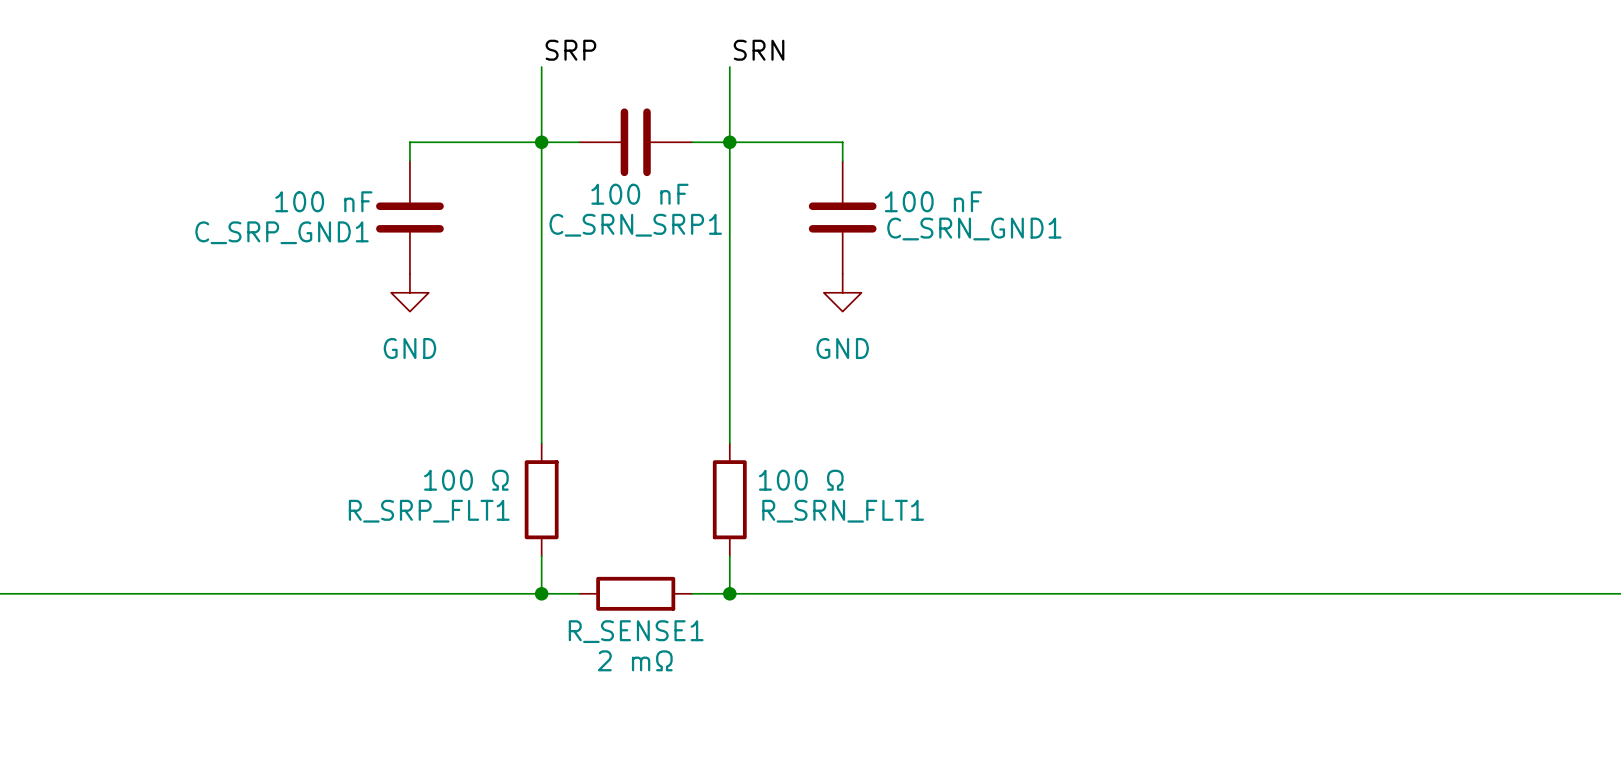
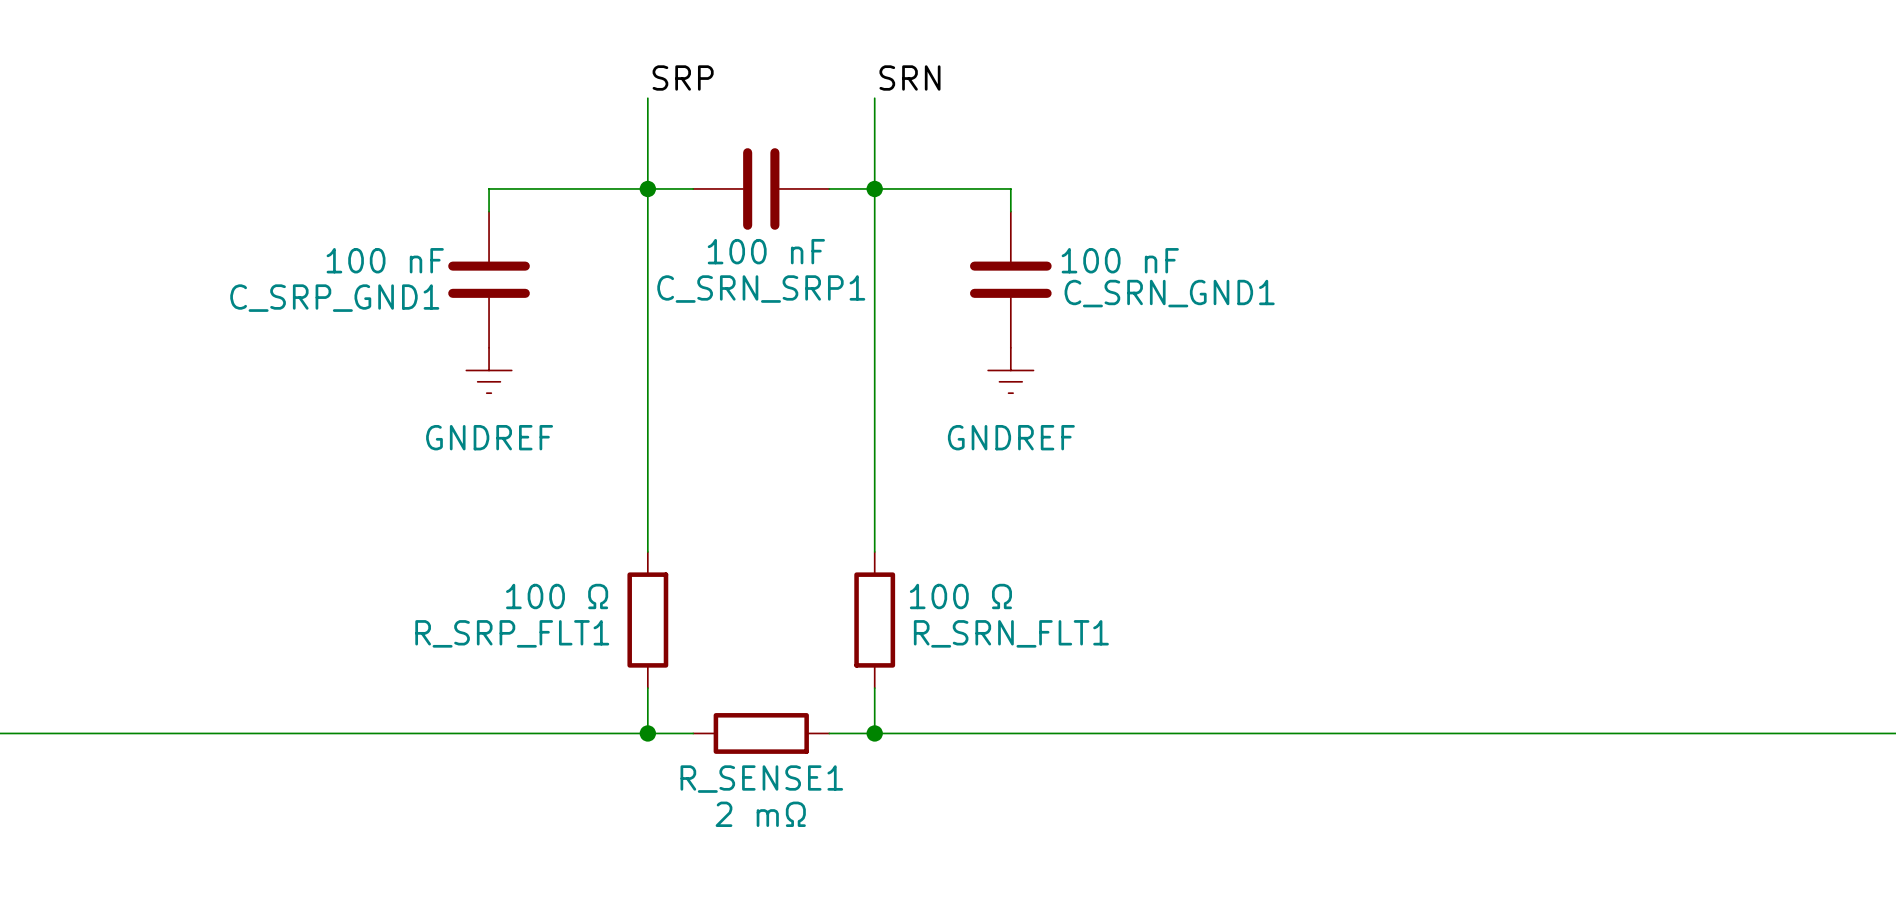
power symbol: GND (409, 292) -> GNDREF (489, 370)
power symbol: GND (842, 292) -> GNDREF (1010, 370)

